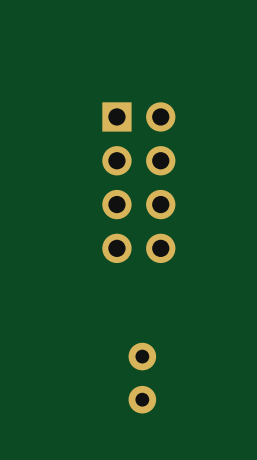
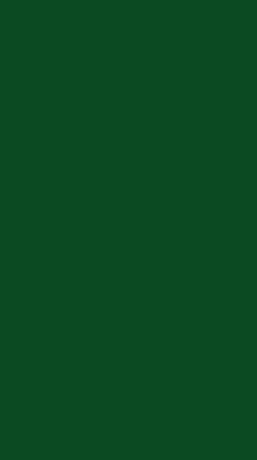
part: (138, 182) -> none
part: (142, 378) -> none

